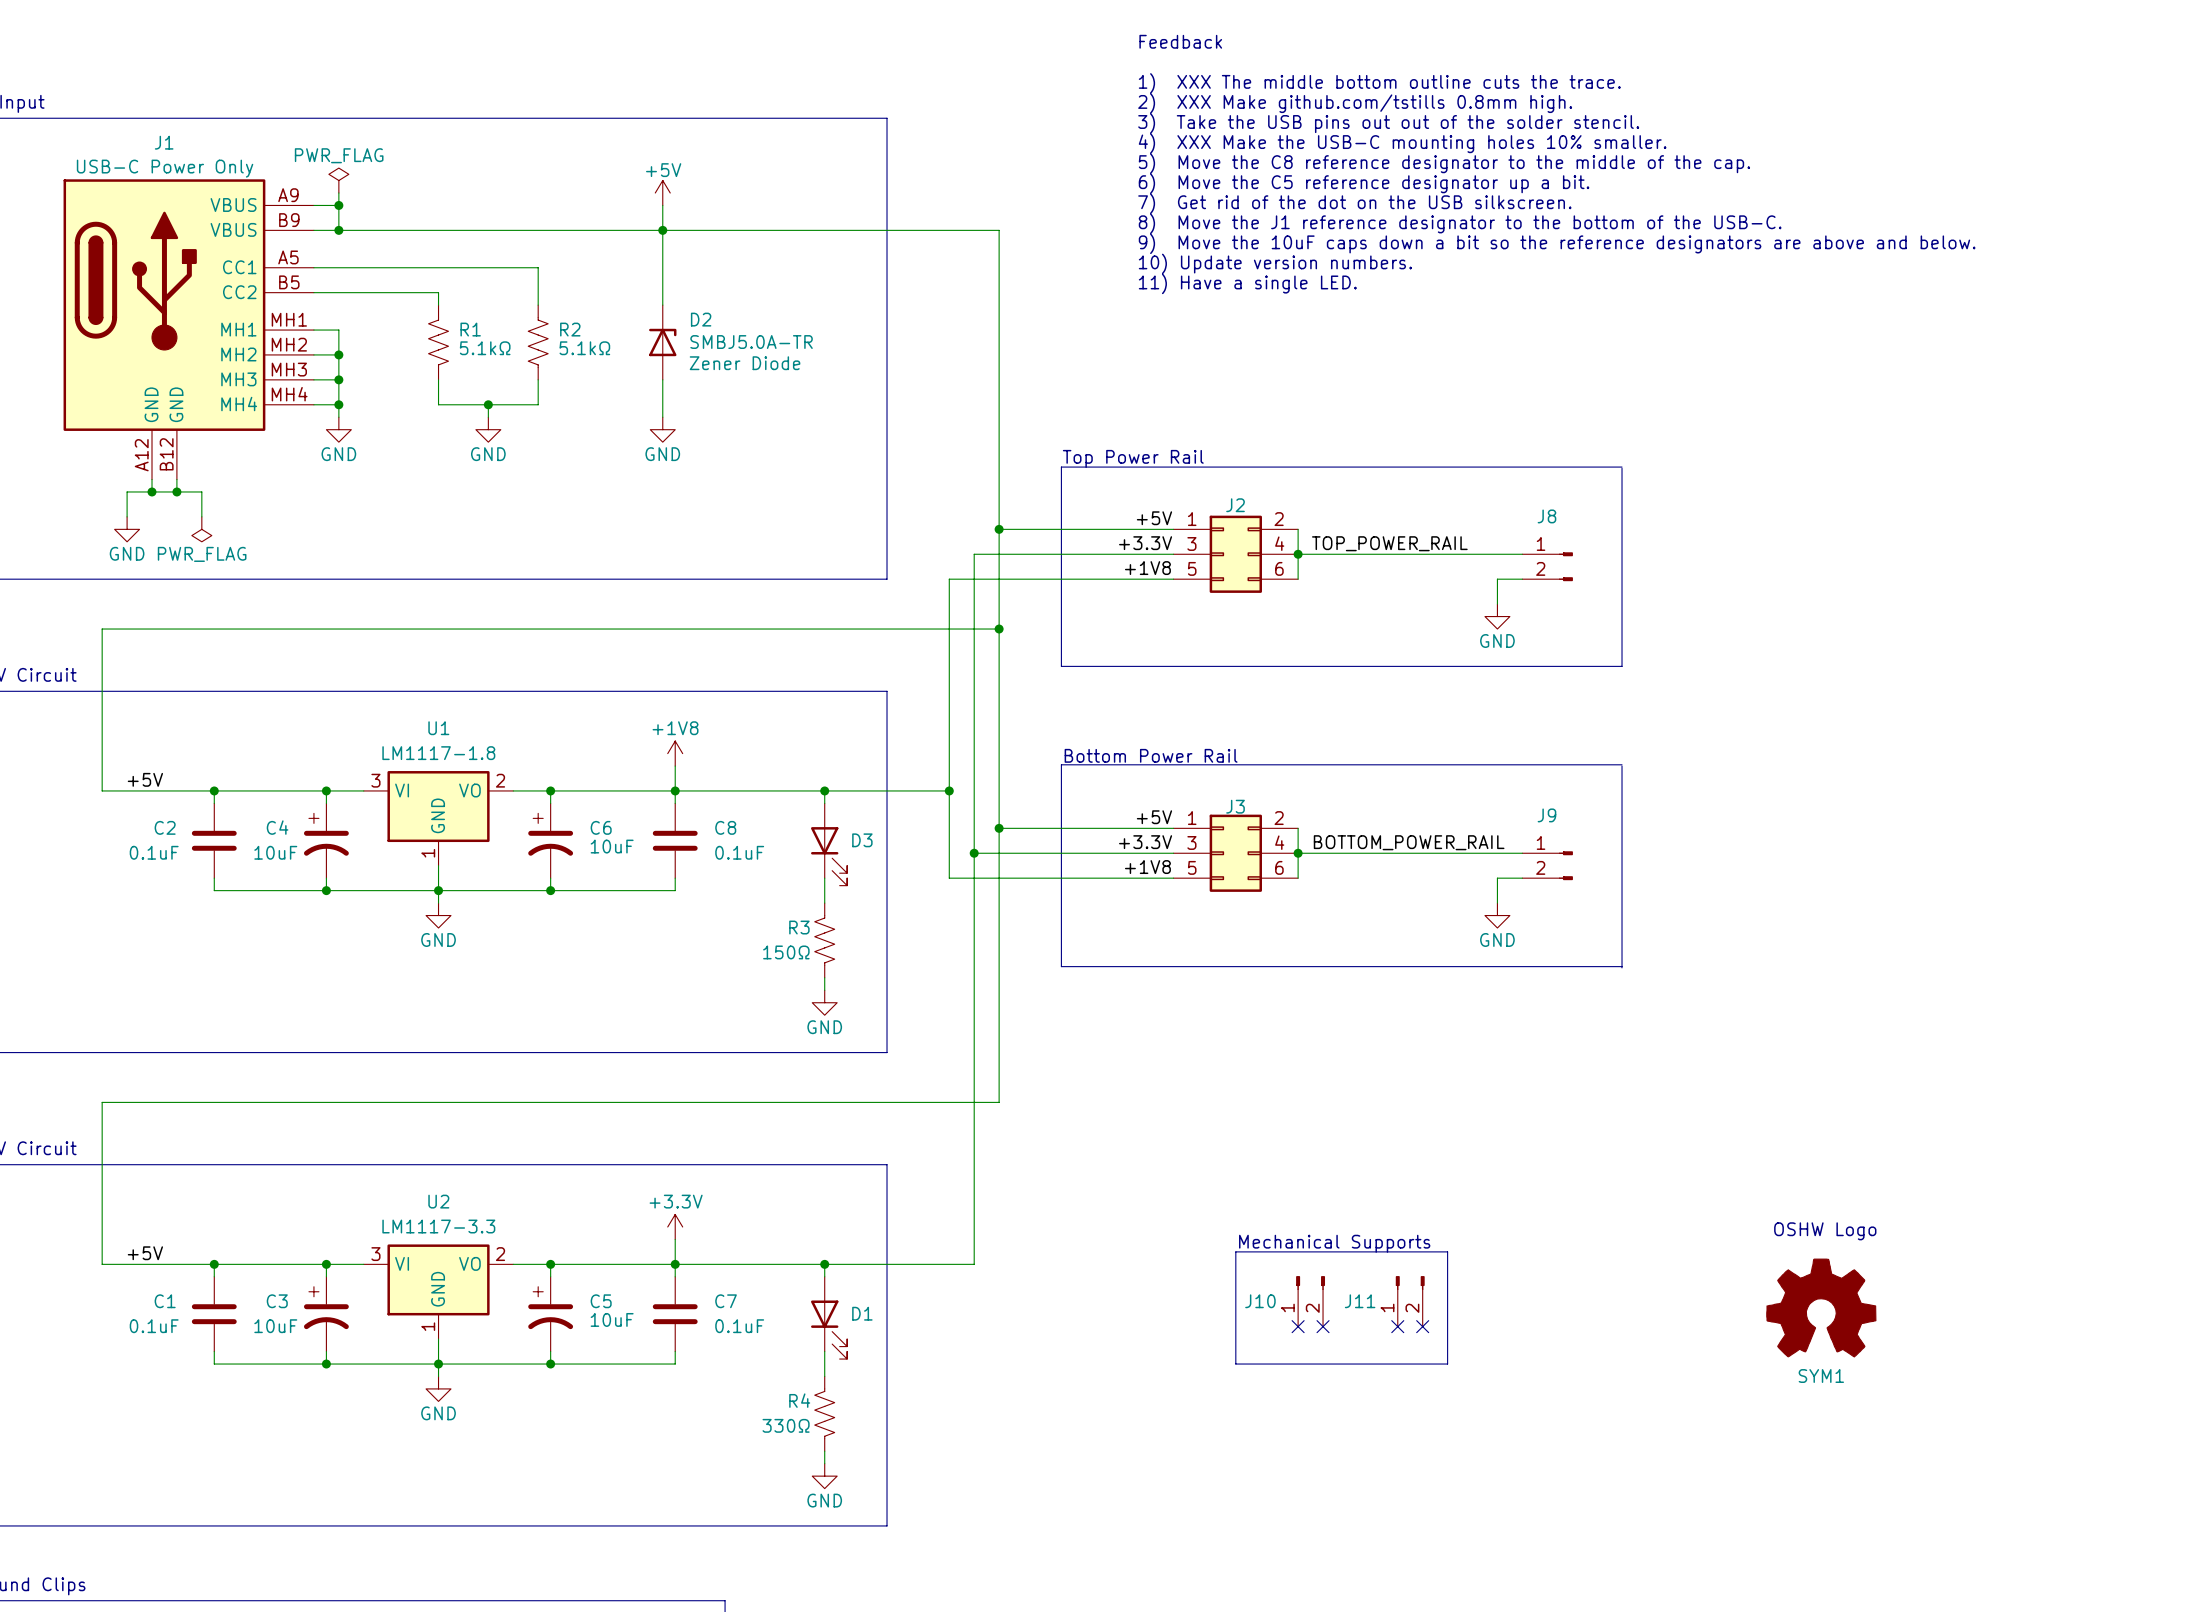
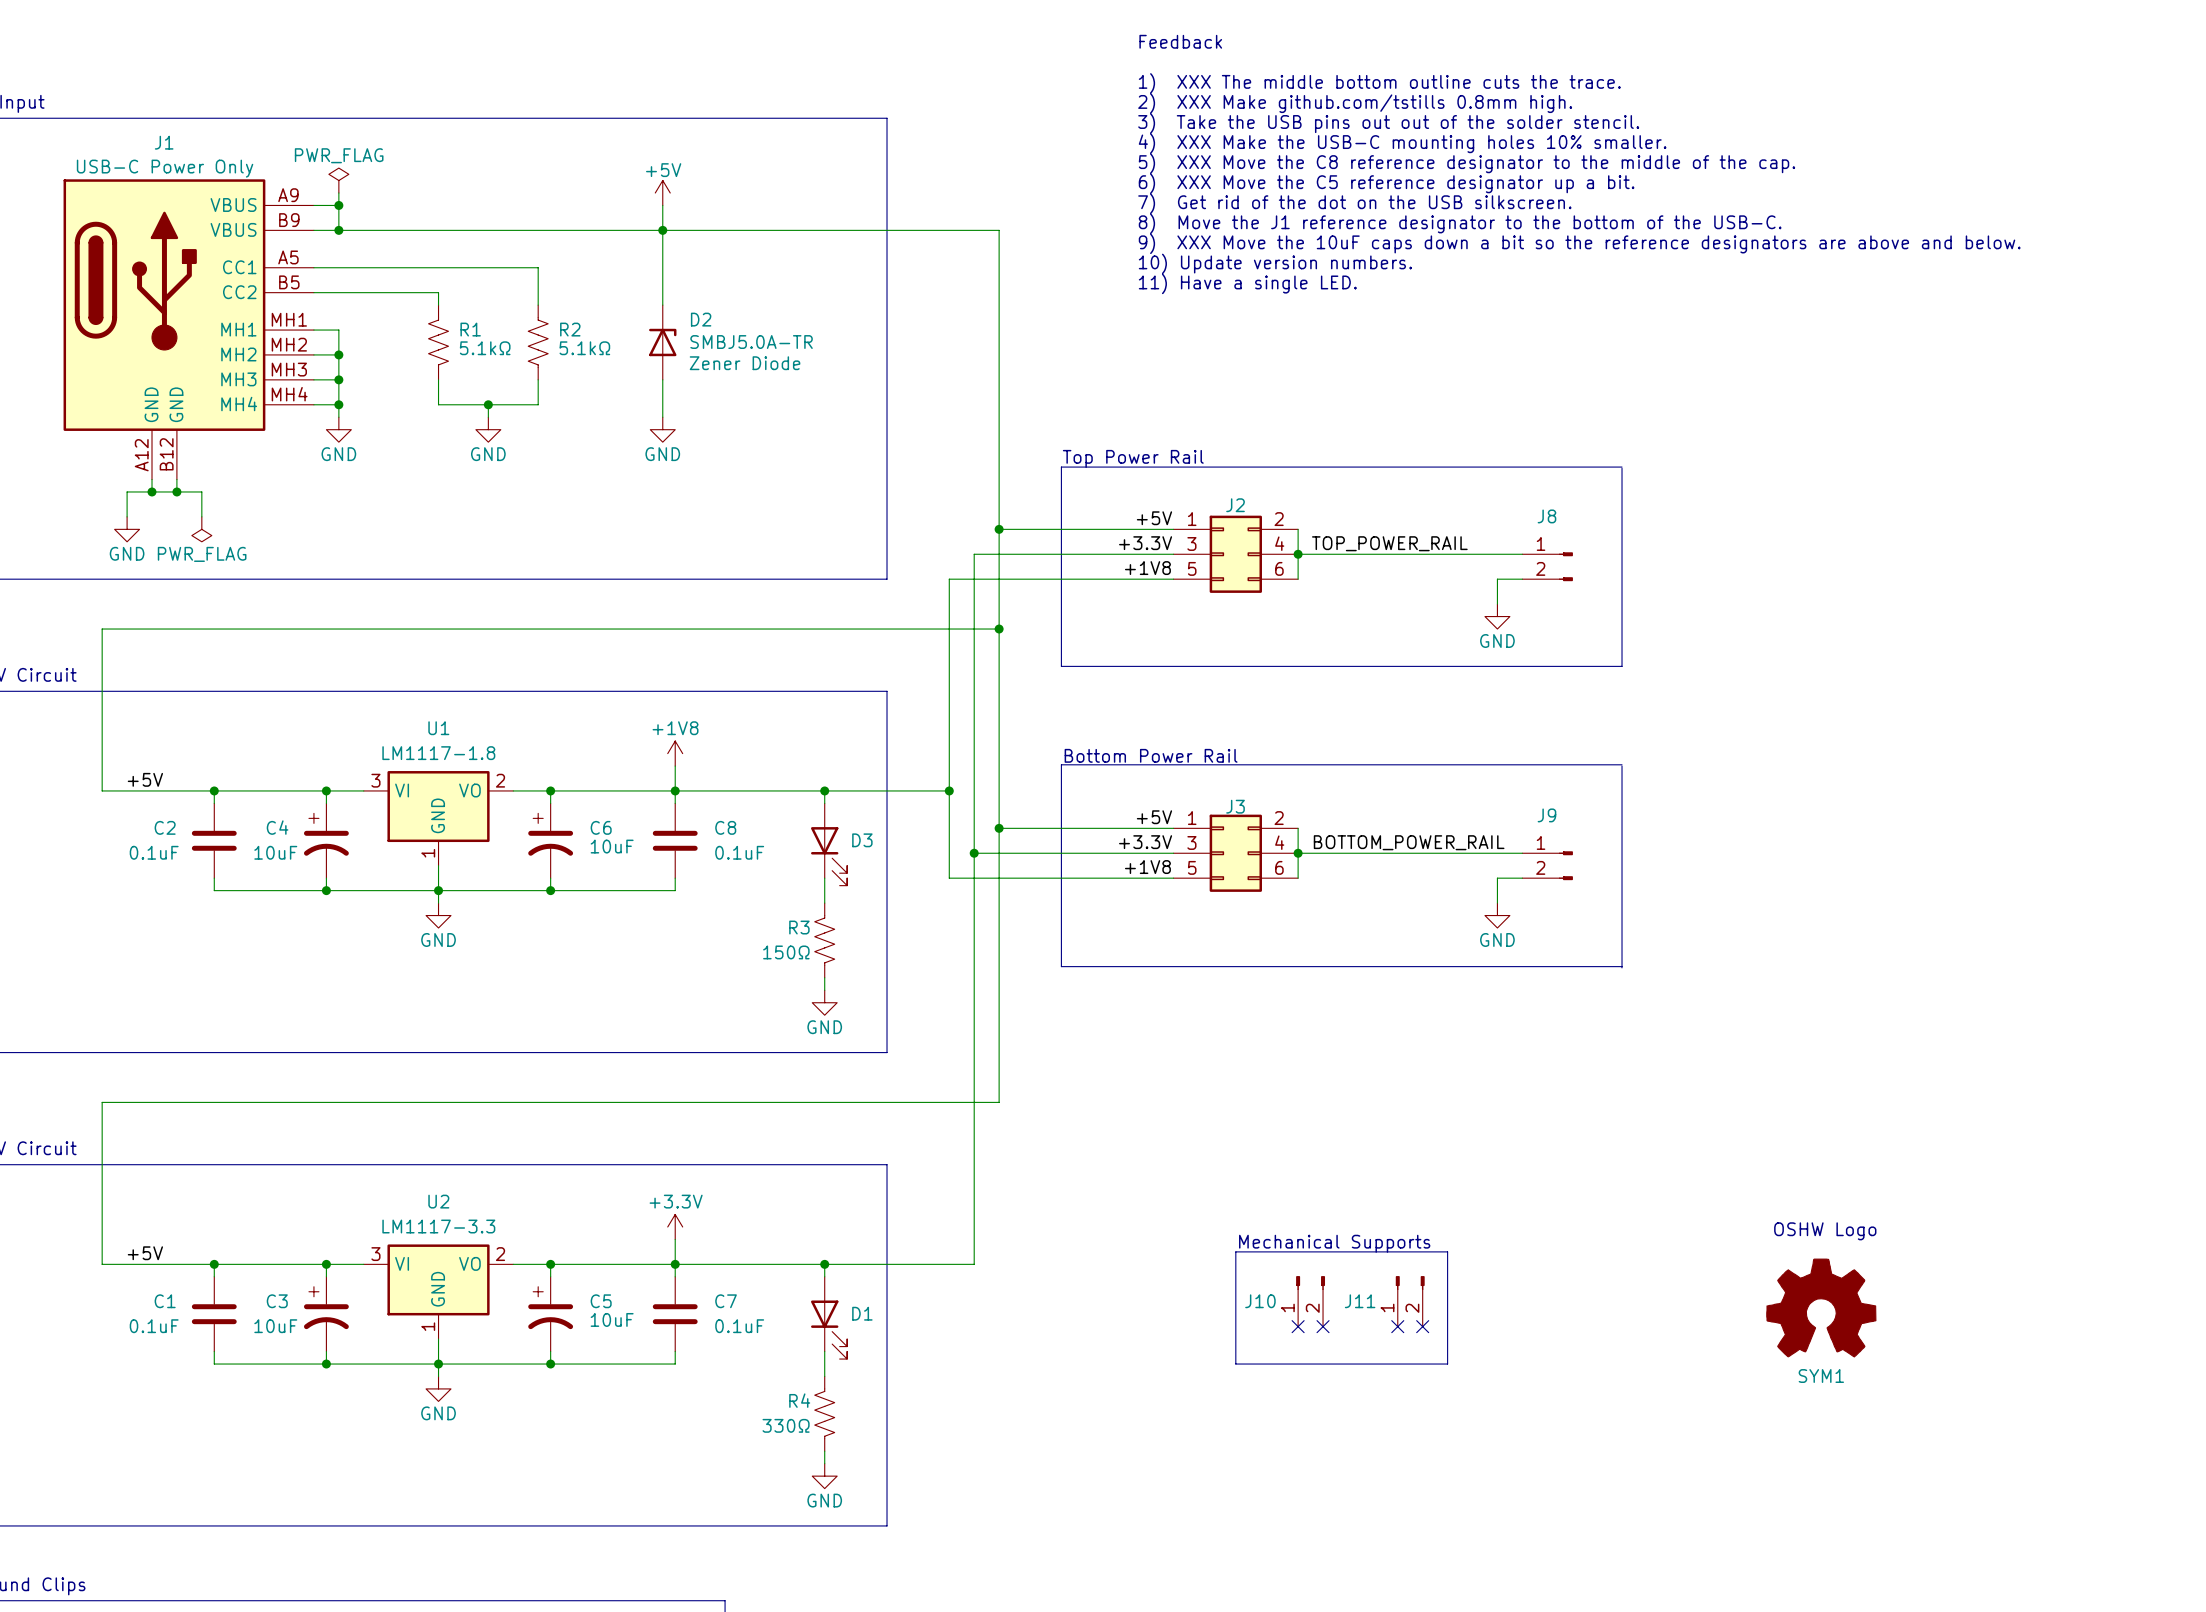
text: 5) Move the C8 reference designator to the middle of the cap. (1444, 163) -> 5) XXX Move the C8 reference designator to the middle of the cap. (1466, 163)
text: 6) Move the C5 reference designator up a bit. (1364, 183) -> 6) XXX Move the C5 reference designator up a bit. (1386, 183)
text: 9) Move the 10uF caps down a bit so the reference designators are above and below. (1557, 243) -> 9) XXX Move the 10uF caps down a bit so the reference designators are above and below. (1579, 243)

